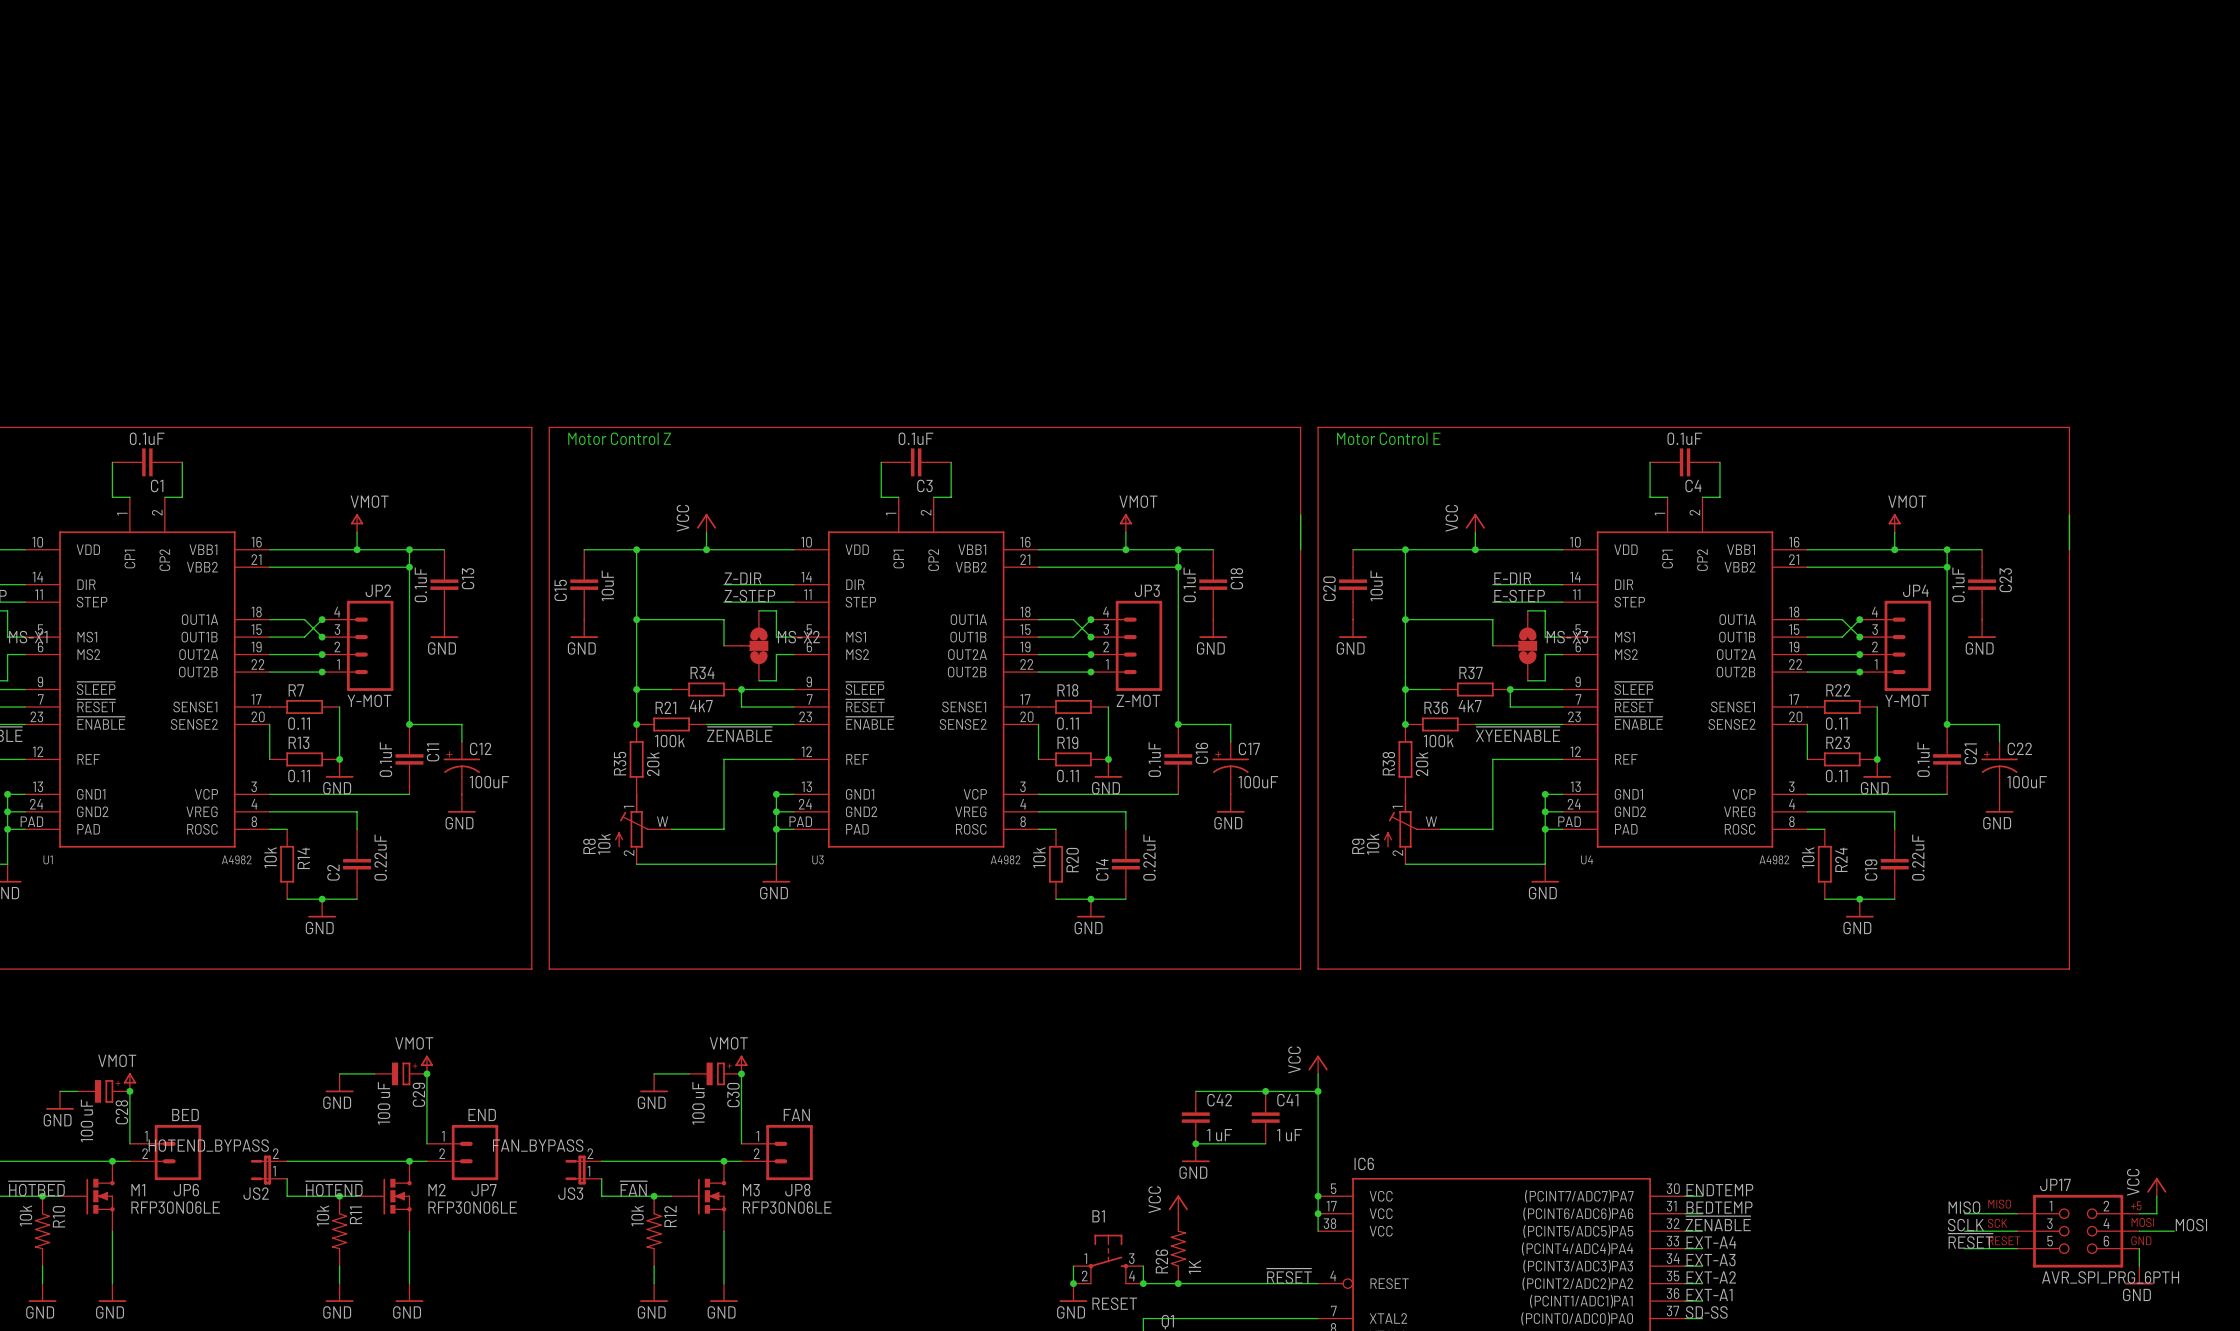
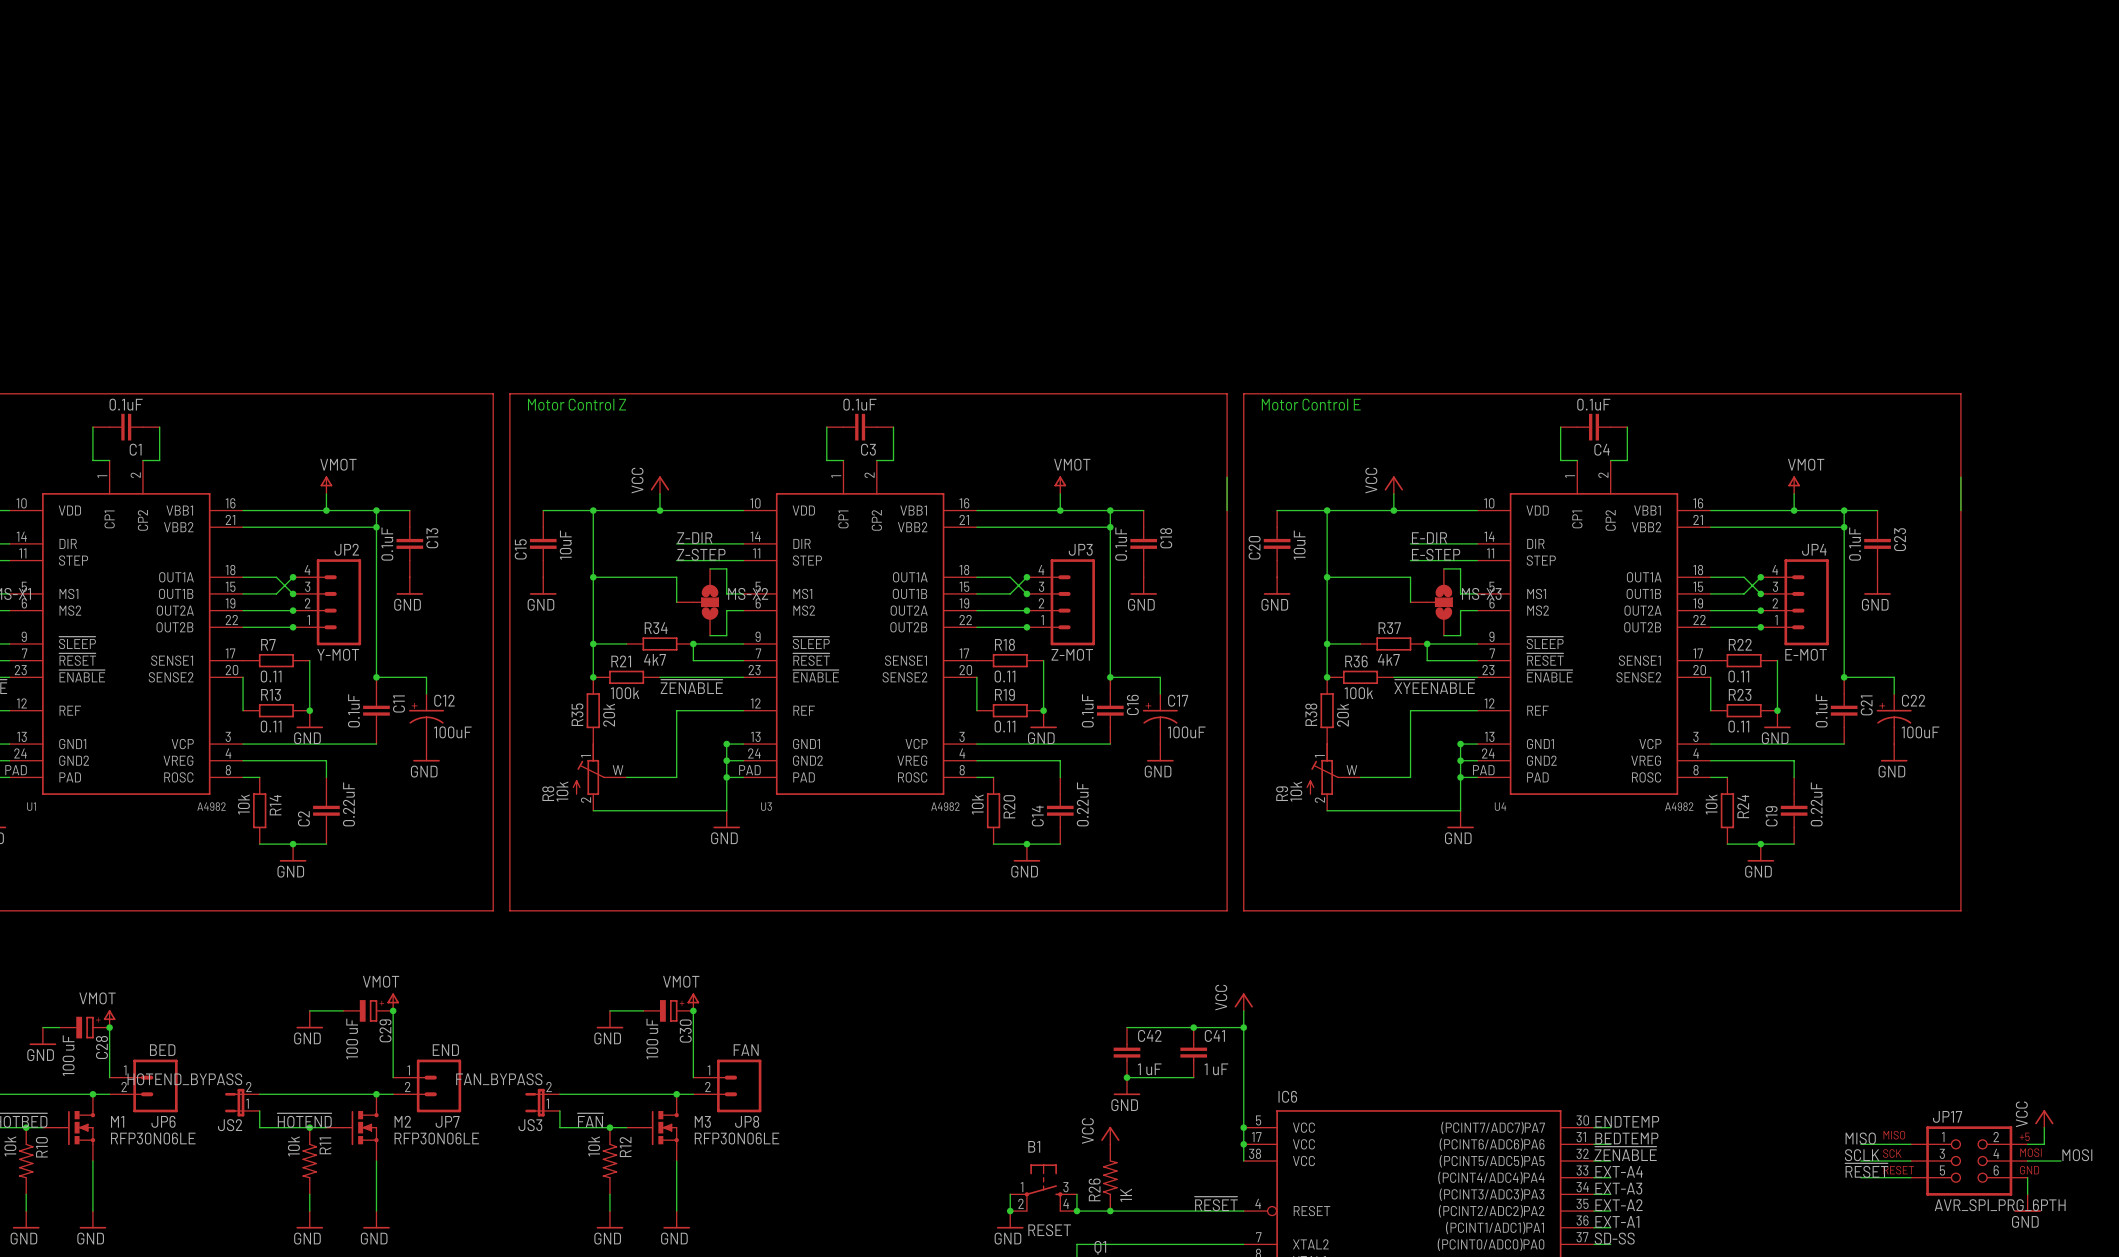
JP4 value: Y-MOT (1907, 700) -> E-MOT (1806, 654)

